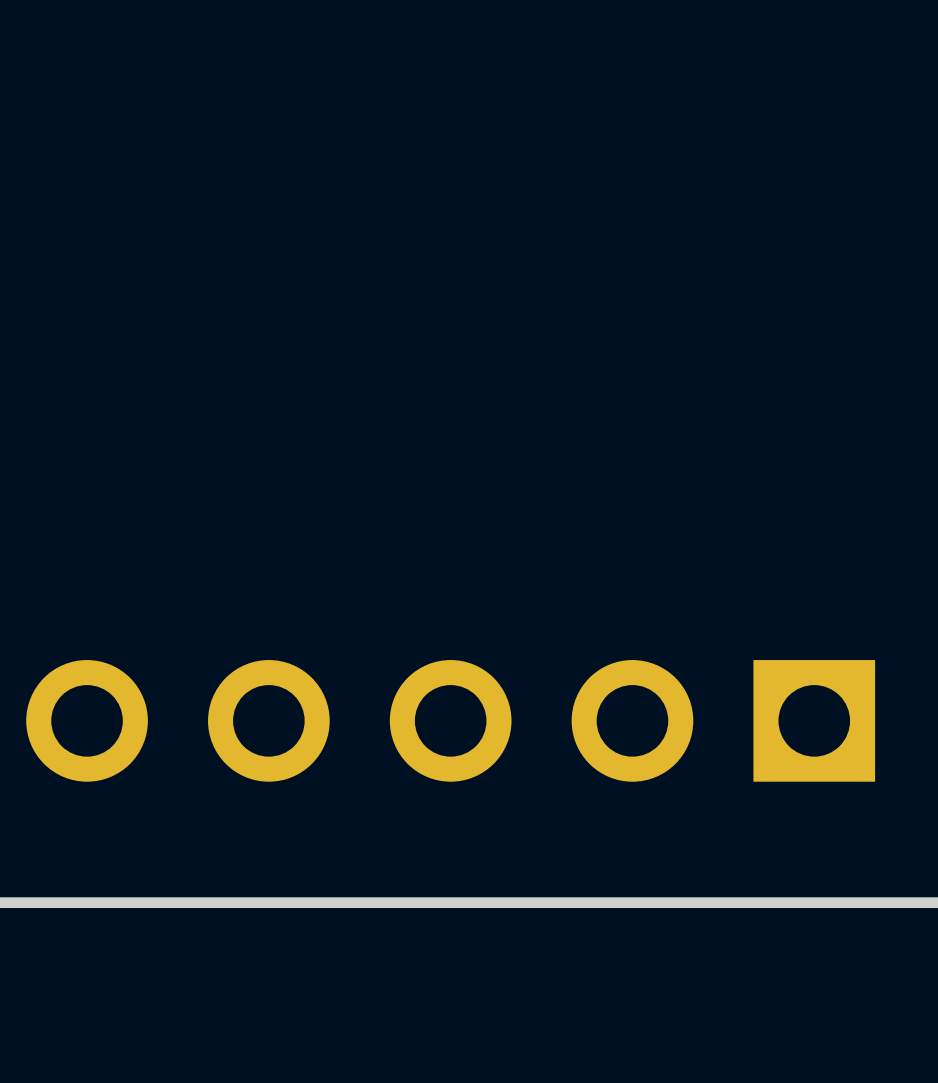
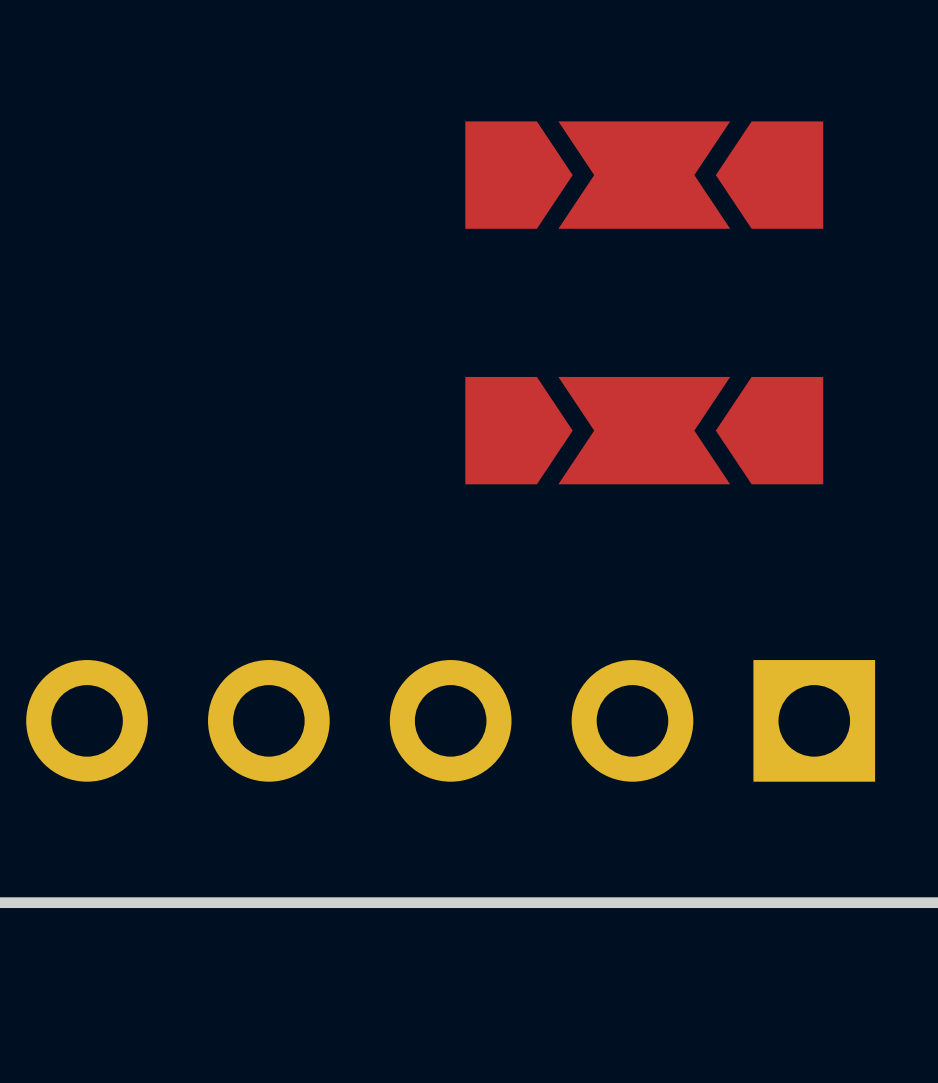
part: none -> (644, 175)
part: none -> (644, 430)

